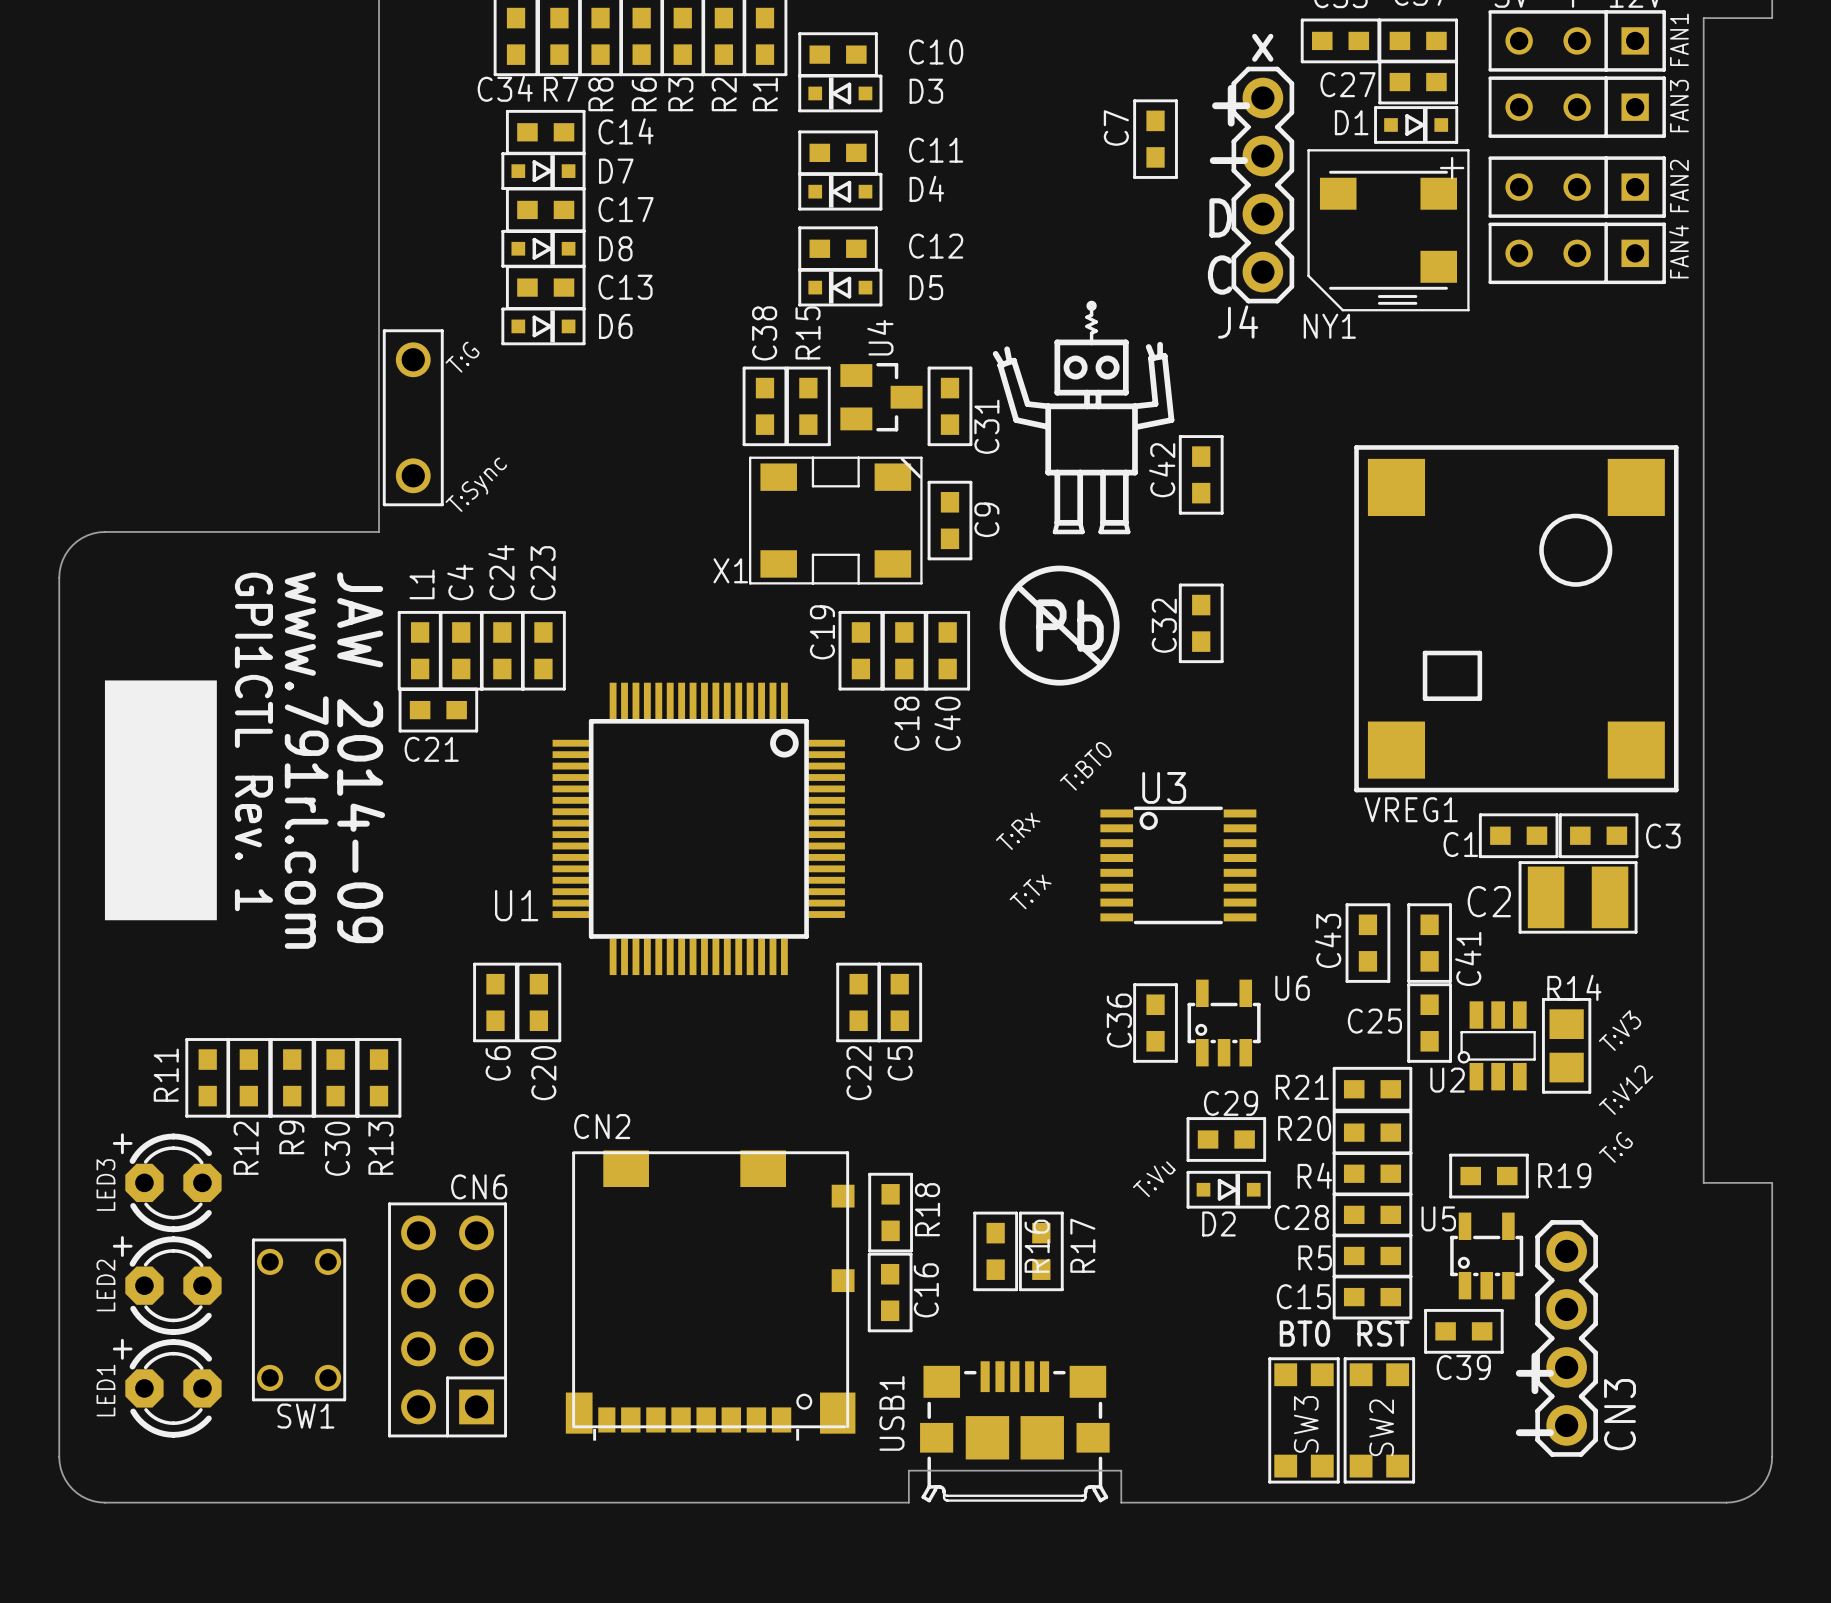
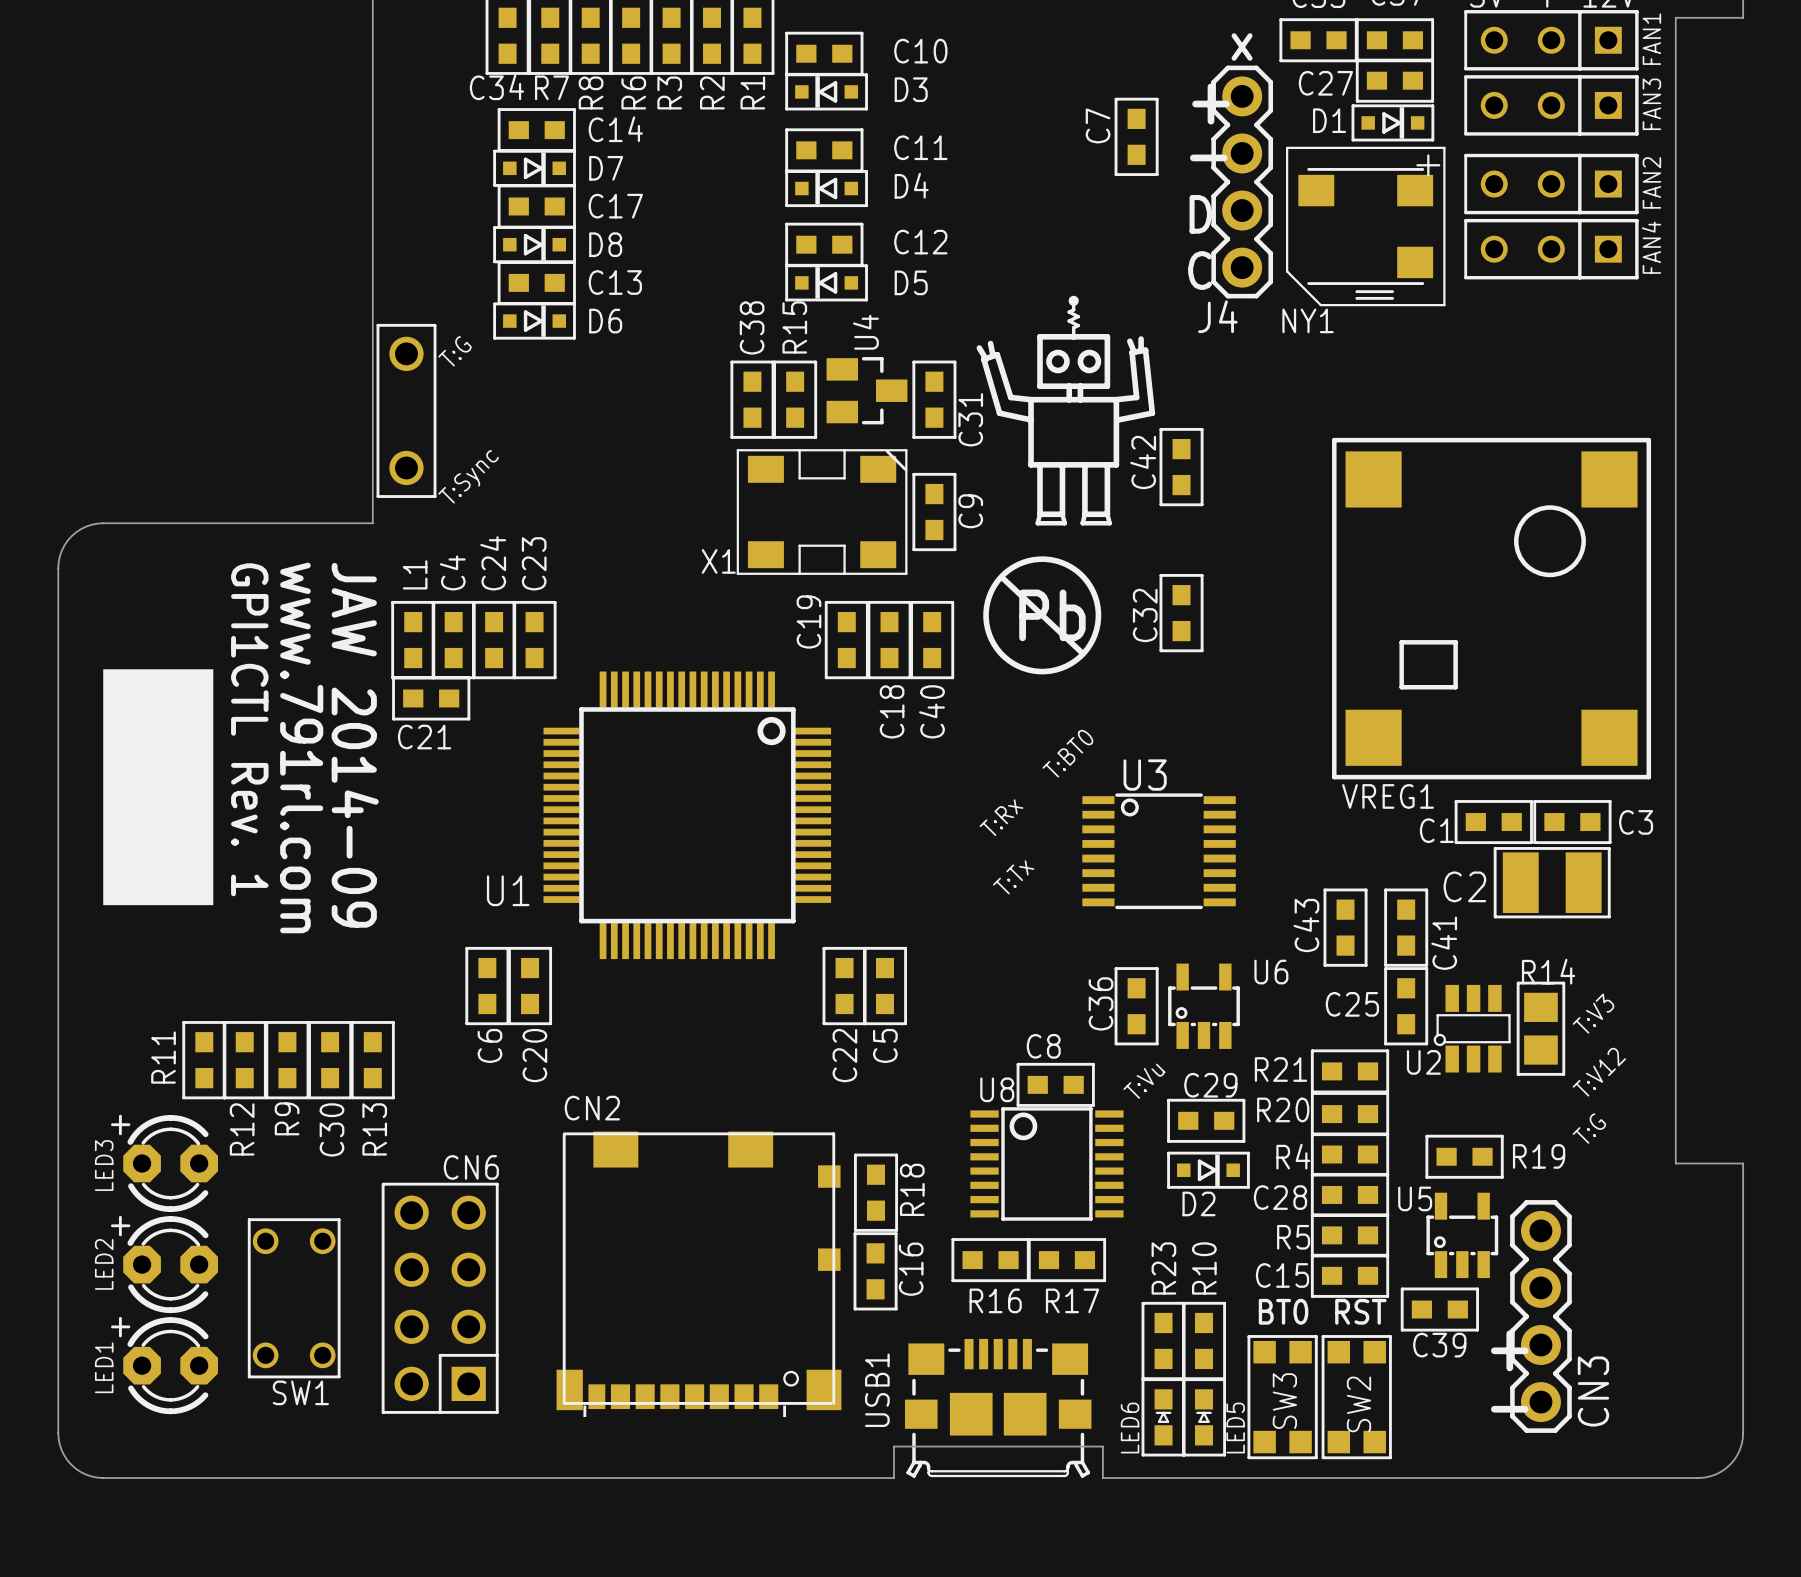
C8: none -> (1055, 1084)
text position: T:Vu (1154, 1179) -> T:Vu (1144, 1081)
U8: none -> (1046, 1163)
R16 rotation: 0° (995, 1251) -> 90° clockwise (990, 1260)
R17 rotation: 0° (1041, 1251) -> 90° clockwise (1066, 1260)
R17 position: (1041, 1251) -> (1066, 1260)
R23: none -> (1163, 1340)
R10: none -> (1203, 1340)
LED6: none -> (1163, 1417)
LED5: none -> (1203, 1417)

